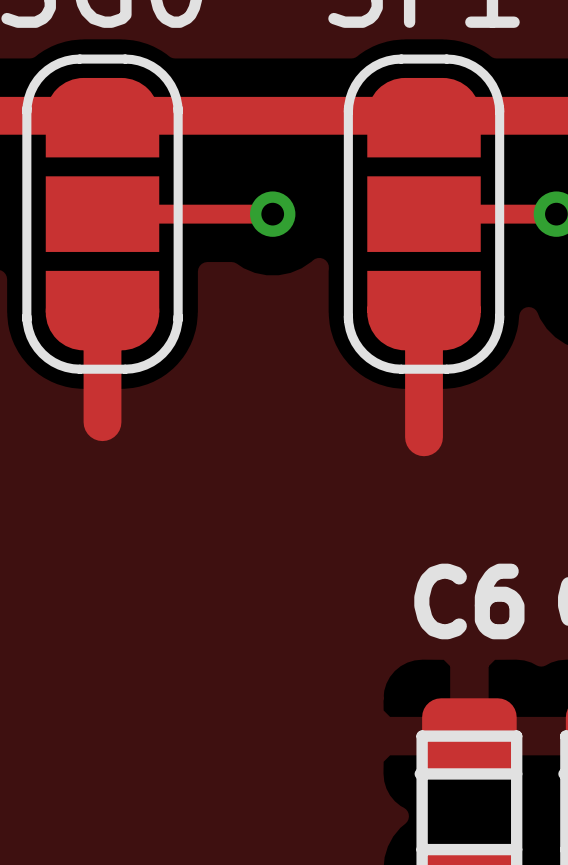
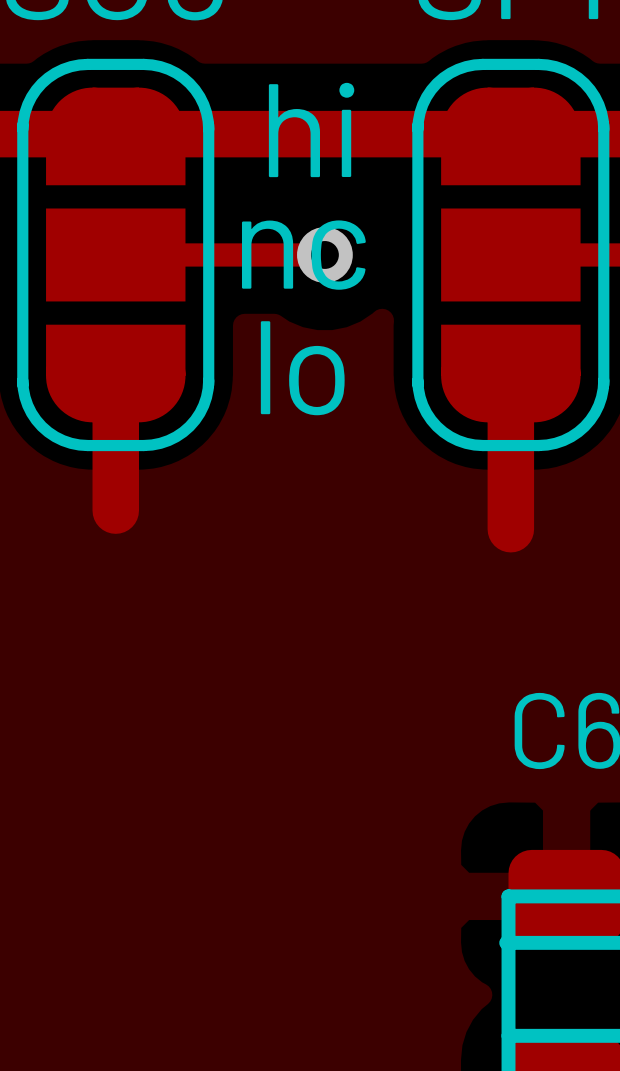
text: none -> hi (311, 129)
text: none -> nc (303, 255)
text: none -> lo (302, 368)

